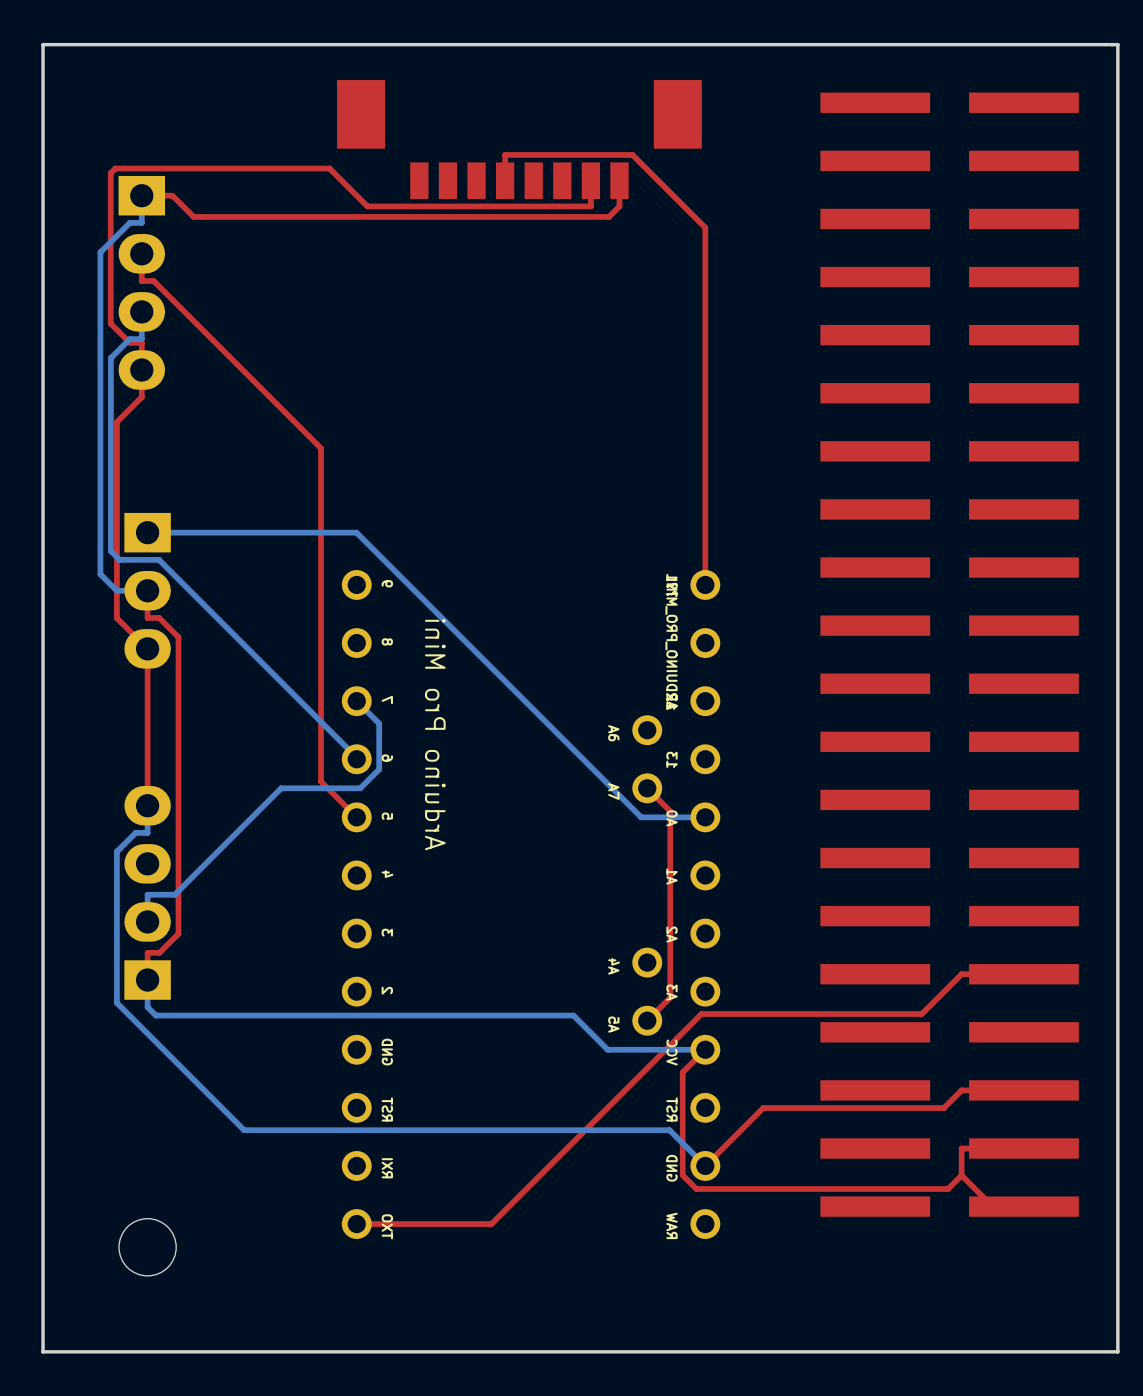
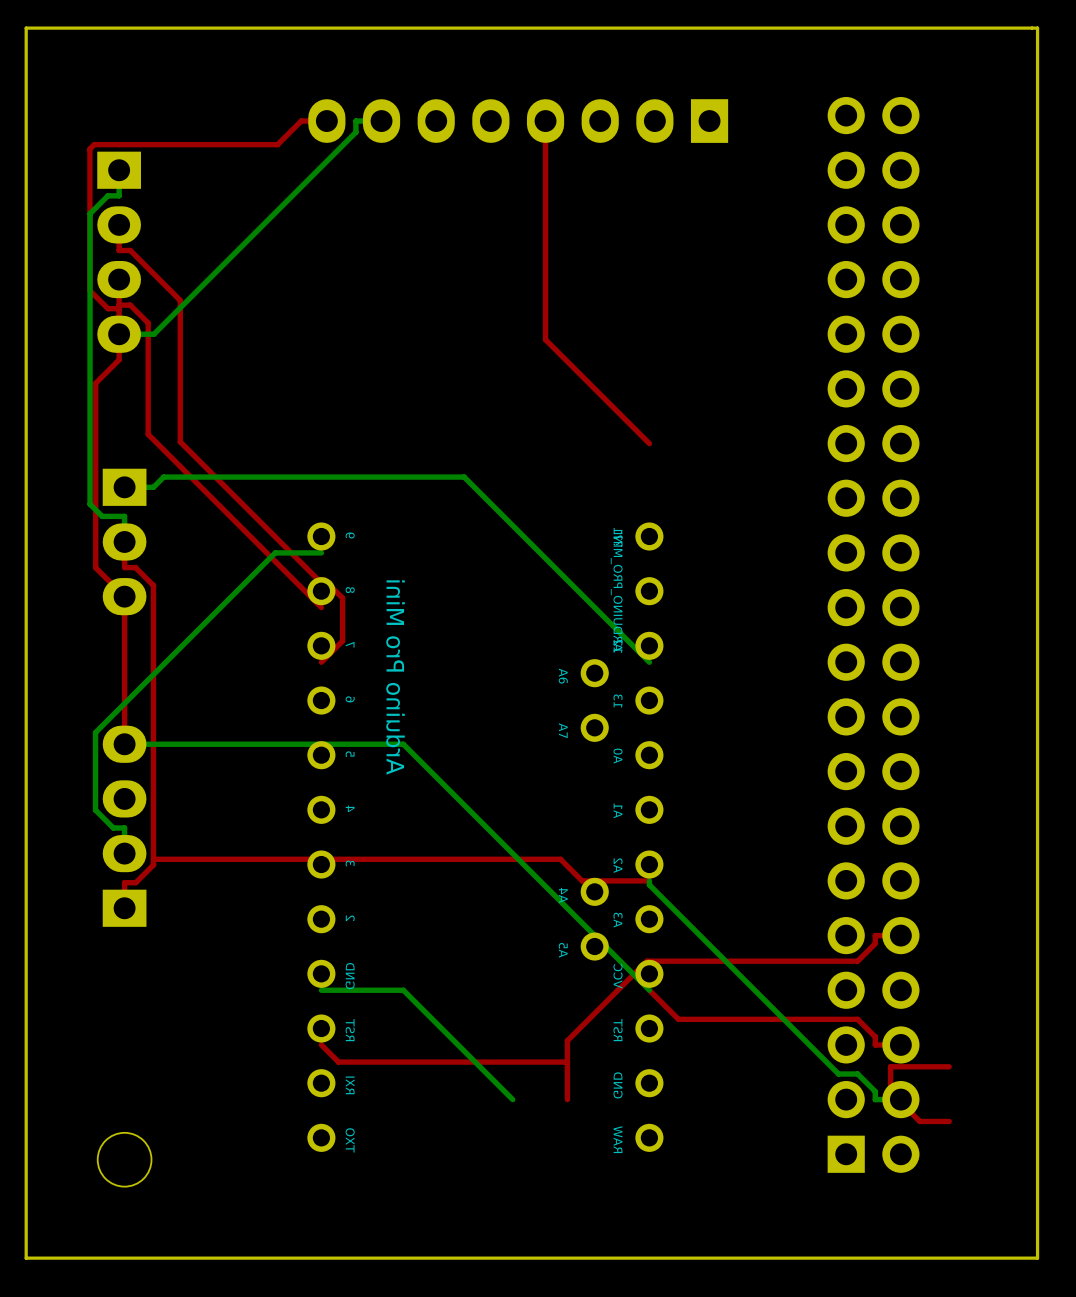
part: (519, 139) -> none
bottom track: none -> (381, 121) (355, 121) (355, 132) (153, 334) (119, 334)
part: none -> (518, 121)
top track: none -> (545, 121) (545, 339) (649, 443)
top track: (310, 168) (329, 168) (367, 206) (590, 206) (590, 180) -> (277, 144) (301, 121) (326, 121)
top track: (505, 180) (505, 154) (632, 154) (705, 227) (705, 584) -> none
top track: (619, 180) (619, 206) (608, 216) (193, 216) (172, 195) (141, 195) -> none
bottom track: (129, 222) (100, 252) (100, 574) (116, 590) (147, 590) -> none
top track: none -> (119, 279) (119, 305) (130, 305) (148, 323) (148, 434) (321, 607)
bottom track: (141, 311) (141, 339) (129, 339) (110, 358) -> (107, 195) (90, 213) (90, 323)
top track: (206, 334) (321, 448) (321, 781) (356, 817) -> (180, 300) (180, 441) (318, 580) (324, 580) (342, 598) (342, 641) (321, 662)
bottom track: (178, 532) (356, 532) (641, 817) (705, 817) -> (153, 487) (163, 477) (464, 477) (649, 662)
bottom track: (110, 551) (119, 559) (159, 559) (356, 759) -> (90, 504) (102, 516) (124, 516) (124, 541)
part: (949, 654) -> none
part: none -> (873, 634)
bottom track: (356, 701) (379, 723) (379, 769) (360, 788) (281, 788) (174, 894) (147, 894) -> (321, 552) (275, 552) (95, 732) (95, 810) (113, 828) (124, 828)
top track: (647, 788) (670, 811) (670, 997) (647, 1020) -> none
bottom track: (147, 805) (147, 832) (135, 832) (116, 851) (116, 1002) (244, 1130) (669, 1130) (705, 1165) -> (124, 744) (403, 744) (649, 990)
top track: none -> (153, 859) (560, 859) (582, 880) (649, 880)
bottom track: none -> (649, 880) (649, 884) (838, 1074) (857, 1074) (875, 1091) (875, 1099) (900, 1099)
top track: (1023, 974) (961, 974) (921, 1014) (701, 1014) (491, 1224) (356, 1224) -> none
bottom track: (147, 980) (147, 1007) (155, 1015) (573, 1015) (607, 1049) (705, 1049) -> none
top track: none -> (900, 935) (875, 935) (875, 943) (857, 961) (647, 961) (567, 1040) (567, 1099)
top track: (705, 1049) (682, 1072) (682, 1175) (696, 1188) (948, 1188) (961, 1175) -> none
bottom track: none -> (321, 990) (403, 990) (512, 1099)
top track: none -> (649, 990) (678, 1019) (857, 1019) (875, 1036) (875, 1044) (900, 1044)
top track: (1023, 1090) (961, 1090) (944, 1108) (763, 1108) (705, 1165) -> none
top track: none -> (321, 1044) (338, 1062) (567, 1062)

